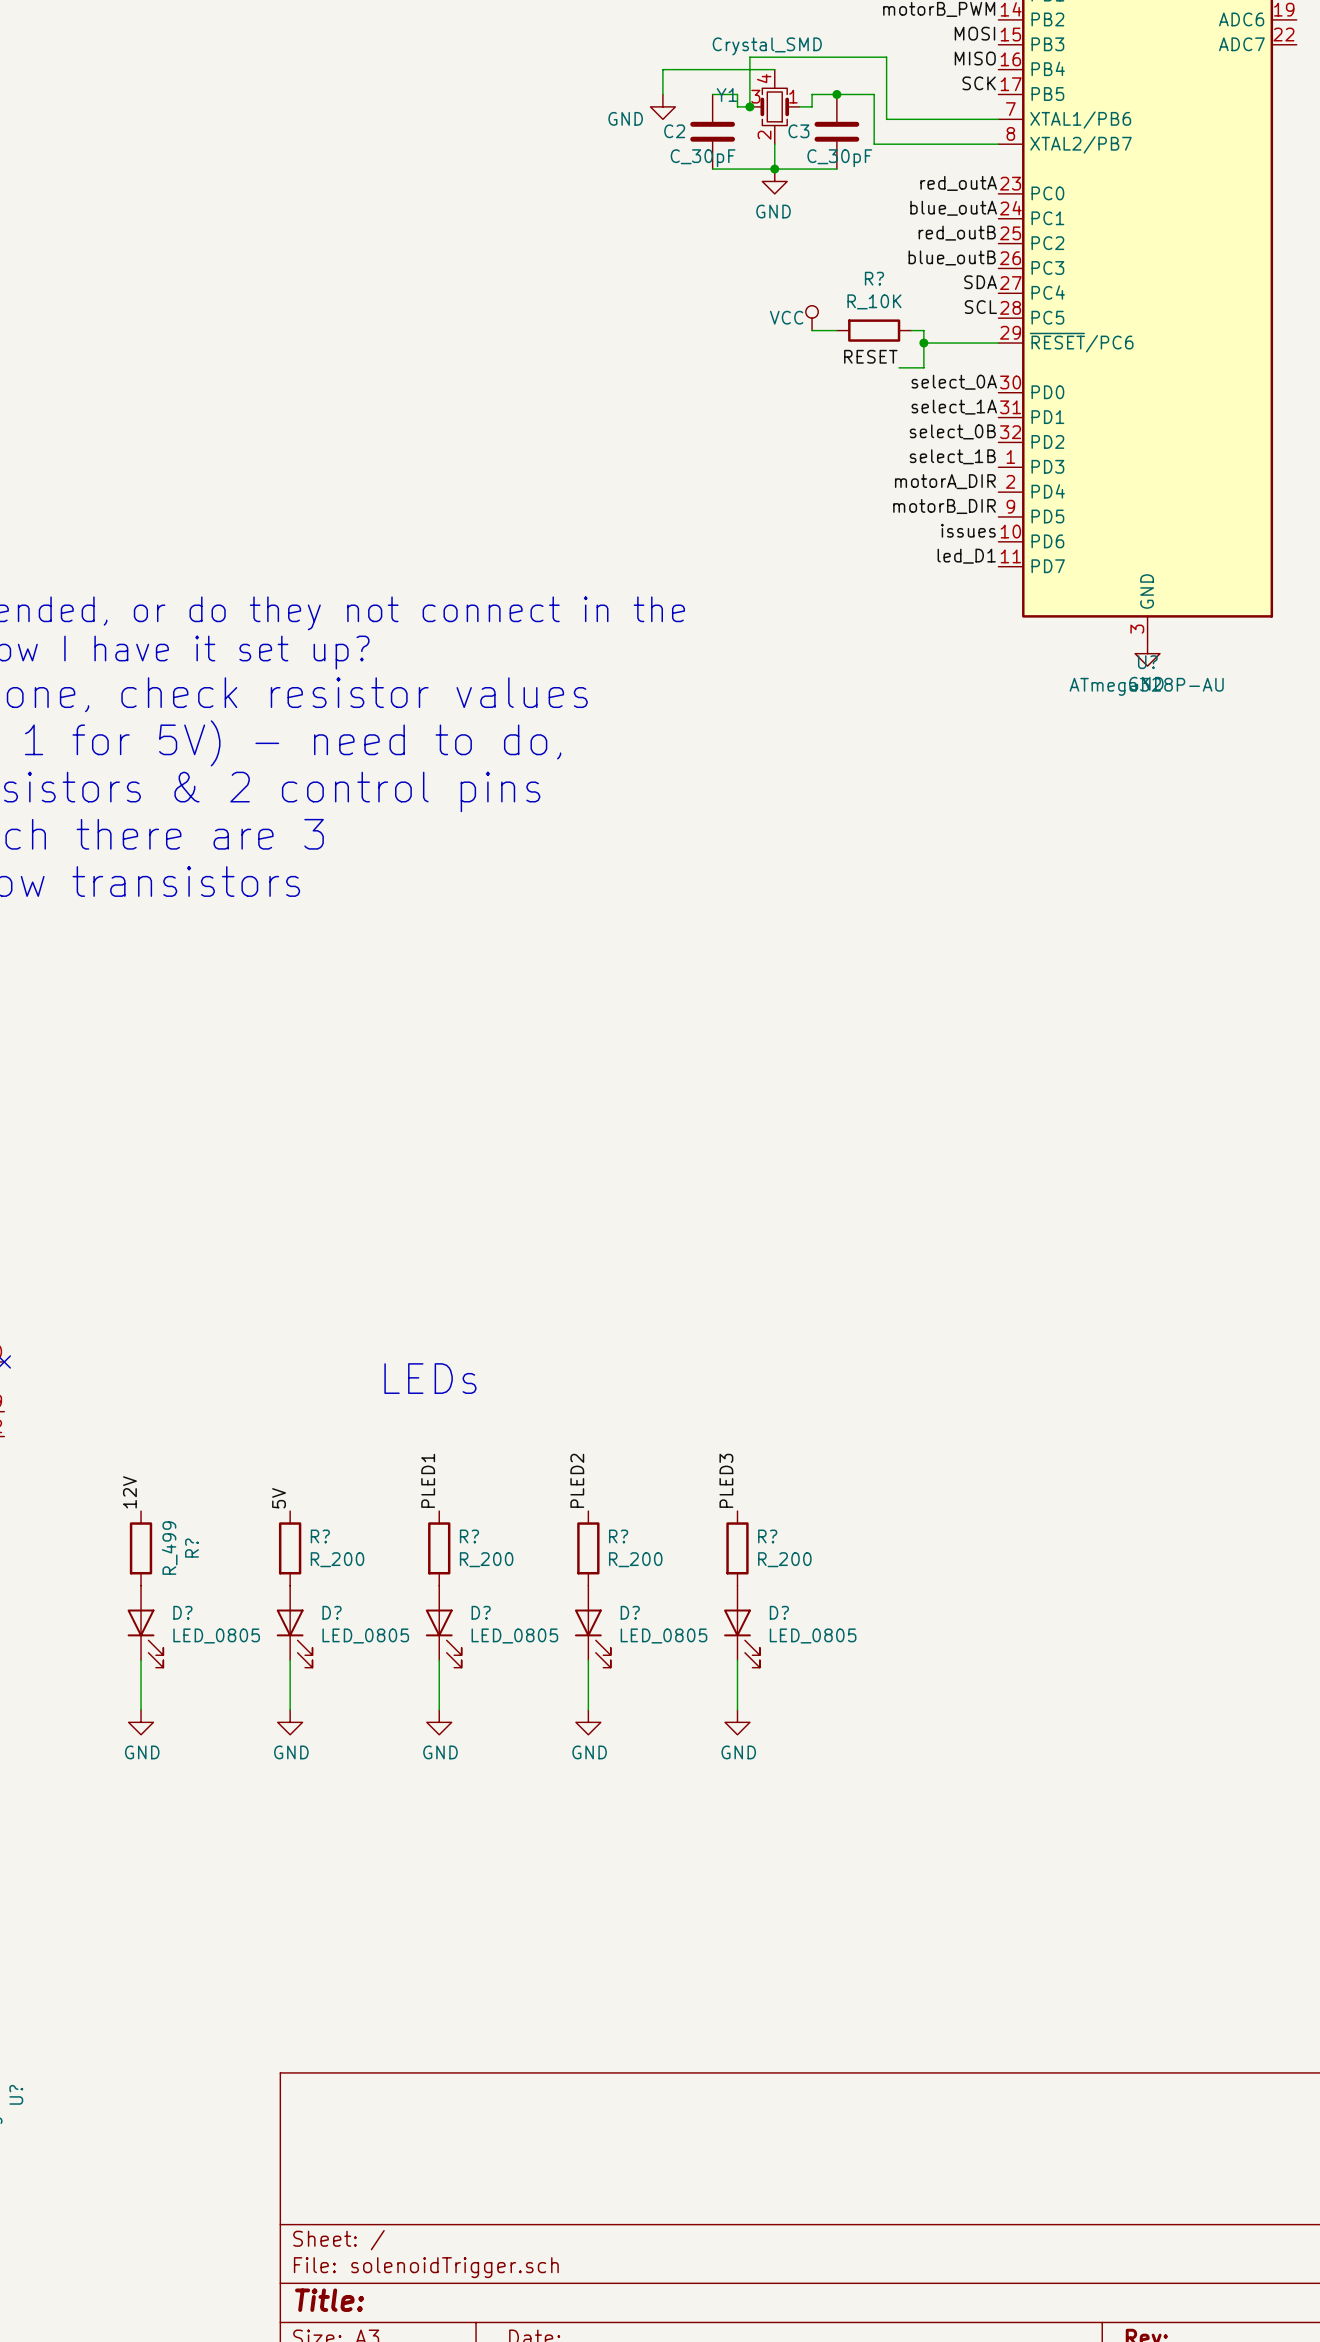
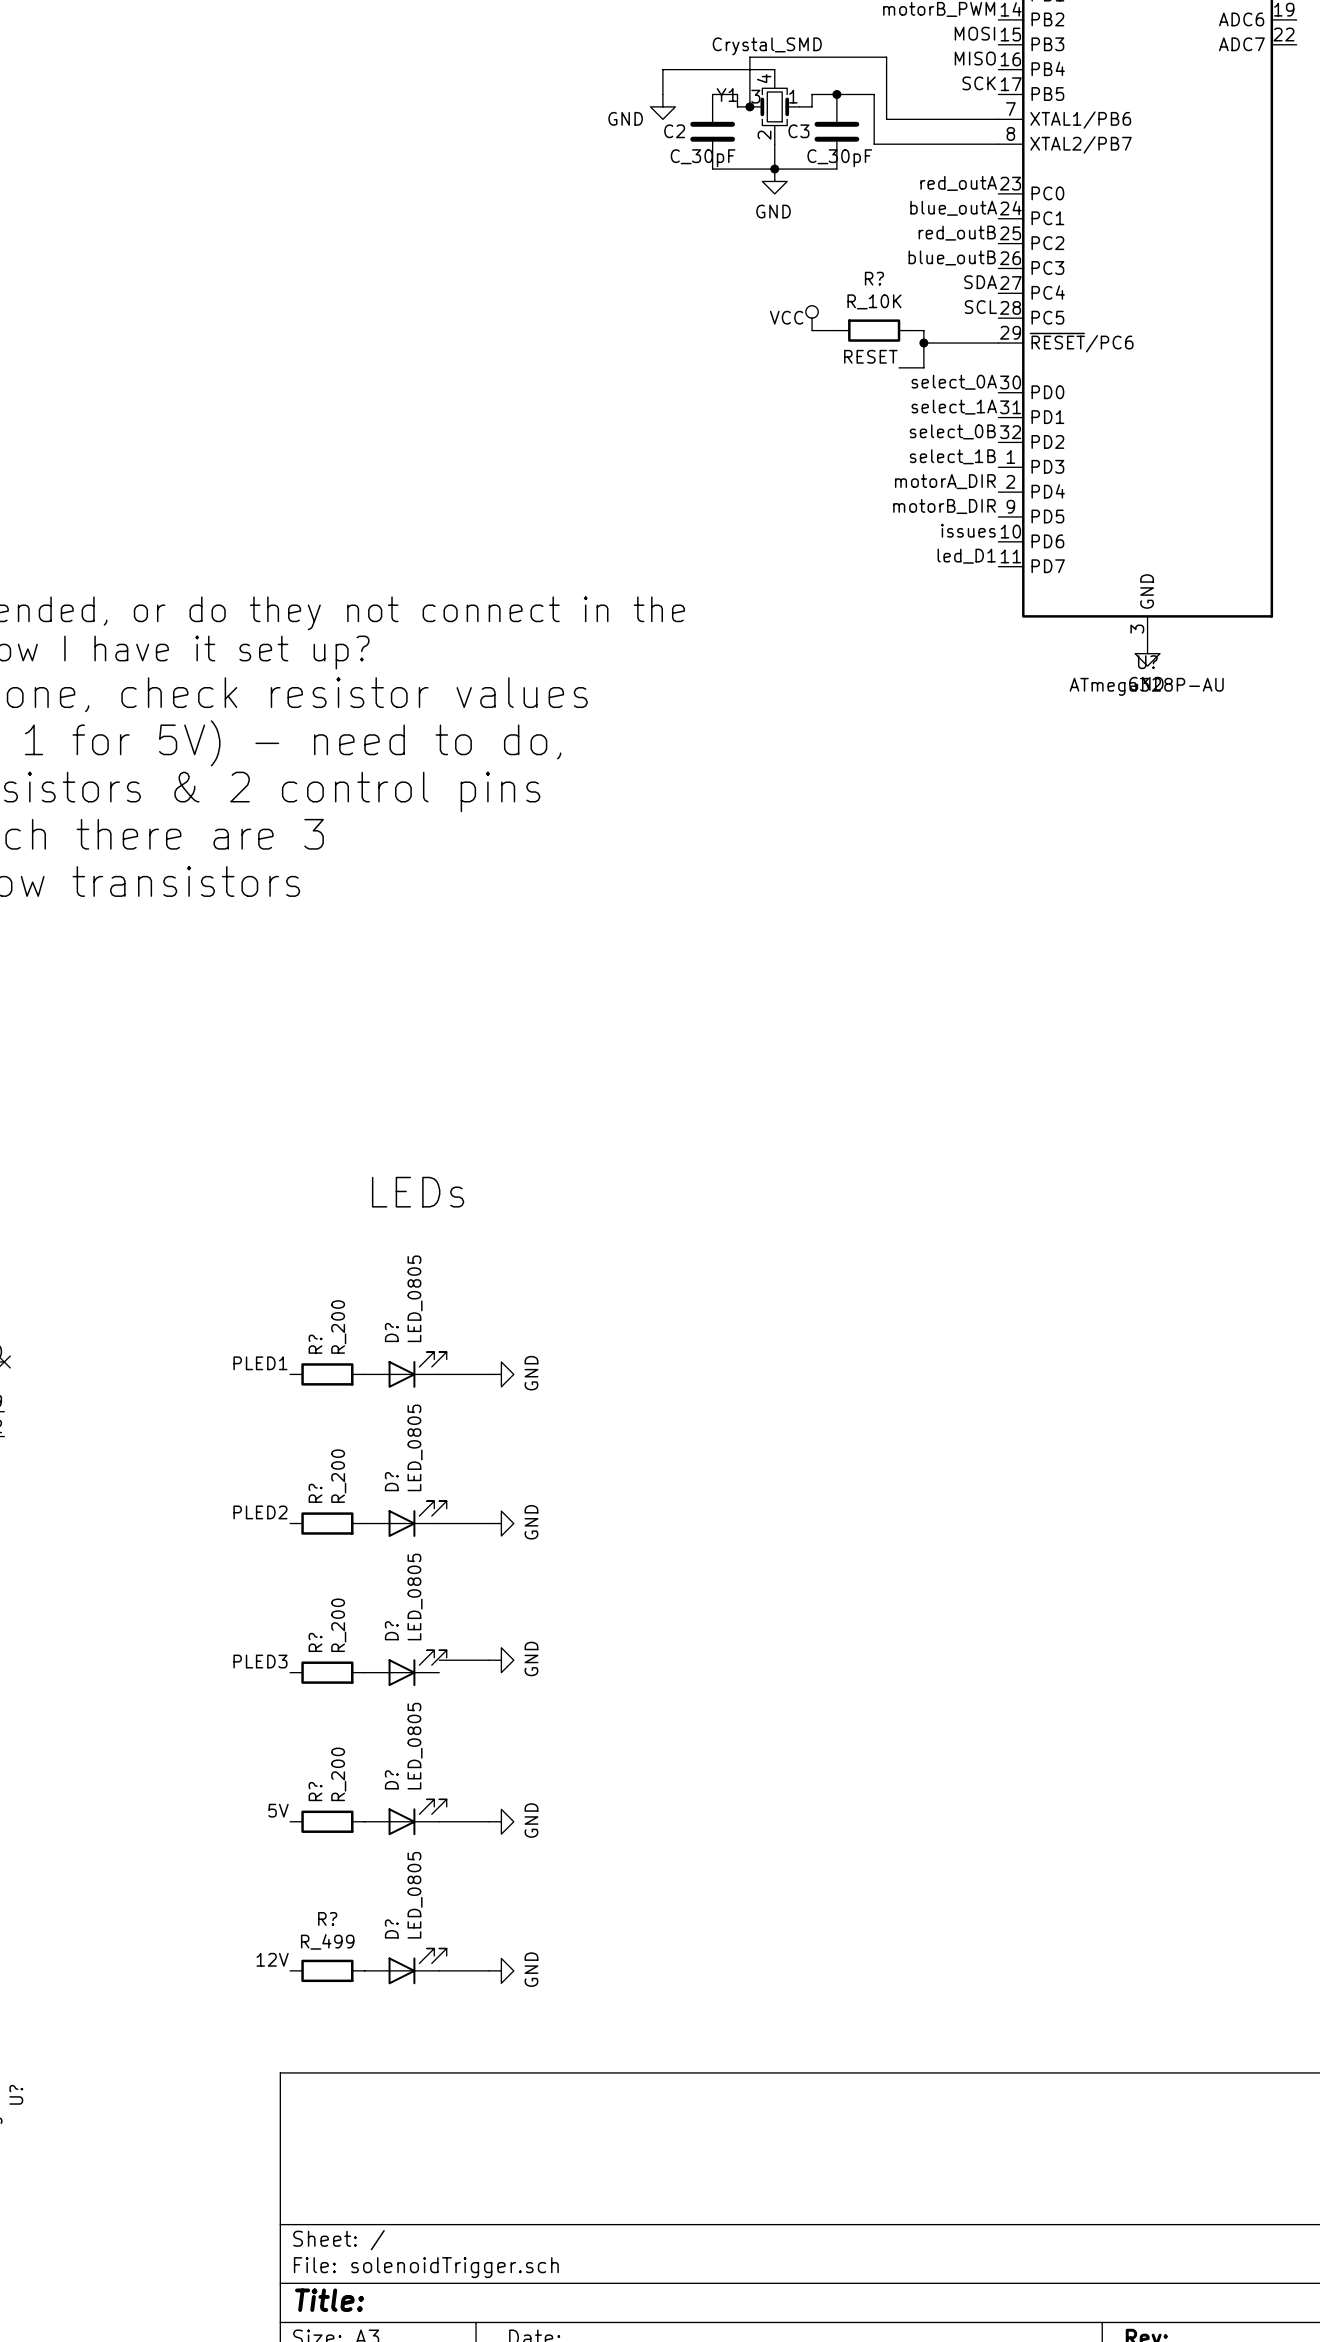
D?: none -> LED_0805 (405, 1369)
R?: none -> R_200 (327, 1374)
wire: none -> (439, 1374) (488, 1374)
power symbol: none -> GND (501, 1374)
text position: LEDs (430, 1378) -> LEDs (418, 1192)
label rotation: 0° (428, 1480) -> 90° clockwise (260, 1363)
label position: PLED1 (428, 1480) -> PLED1 (260, 1363)
label: PLED2 (577, 1480) -> none
label: PLED3 (726, 1480) -> none
label: 12V (129, 1492) -> none
label: 5V (279, 1498) -> PLED2 (260, 1512)
D?: none -> LED_0805 (405, 1519)
wire: none -> (439, 1523) (488, 1523)
power symbol: none -> GND (501, 1523)
R? name position: R? (320, 1536) -> R? (315, 1493)
R?: R_499 (141, 1548) -> none
R? rotation: 0° (290, 1548) -> 90° clockwise (327, 1523)
R? position: (290, 1548) -> (327, 1523)
R?: R_200 (439, 1548) -> none
R?: R_200 (588, 1548) -> none
R?: R_200 (737, 1548) -> none
R? value position: R_200 (337, 1559) -> R_200 (338, 1476)
D?: LED_0805 (145, 1626) -> none
D?: LED_0805 (294, 1626) -> none
D? position: (443, 1626) -> (405, 1668)
D?: LED_0805 (592, 1626) -> none
D?: LED_0805 (741, 1626) -> none
D? rotation: 0° (443, 1638) -> 90° counterclockwise (417, 1668)
wire: (141, 1660) (141, 1709) -> none
wire: (290, 1660) (290, 1709) -> none
wire: (439, 1660) (439, 1709) -> (439, 1660) (488, 1660)
power symbol: none -> GND (501, 1660)
wire: (588, 1660) (588, 1709) -> none
wire: (737, 1660) (737, 1709) -> none
label: none -> PLED3 (260, 1661)
R?: none -> R_200 (327, 1672)
power symbol: GND (141, 1722) -> none
power symbol: GND (290, 1722) -> none
power symbol: GND (439, 1722) -> none
power symbol: GND (588, 1722) -> none
power symbol: GND (737, 1722) -> none
label: none -> 5V (278, 1810)
D?: none -> LED_0805 (405, 1817)
R?: none -> R_200 (327, 1821)
wire: none -> (439, 1821) (488, 1821)
power symbol: none -> GND (501, 1821)
label: none -> 12V (272, 1959)
D?: none -> LED_0805 (405, 1966)
R?: none -> R_499 (327, 1970)
wire: none -> (439, 1970) (488, 1970)
power symbol: none -> GND (501, 1970)

